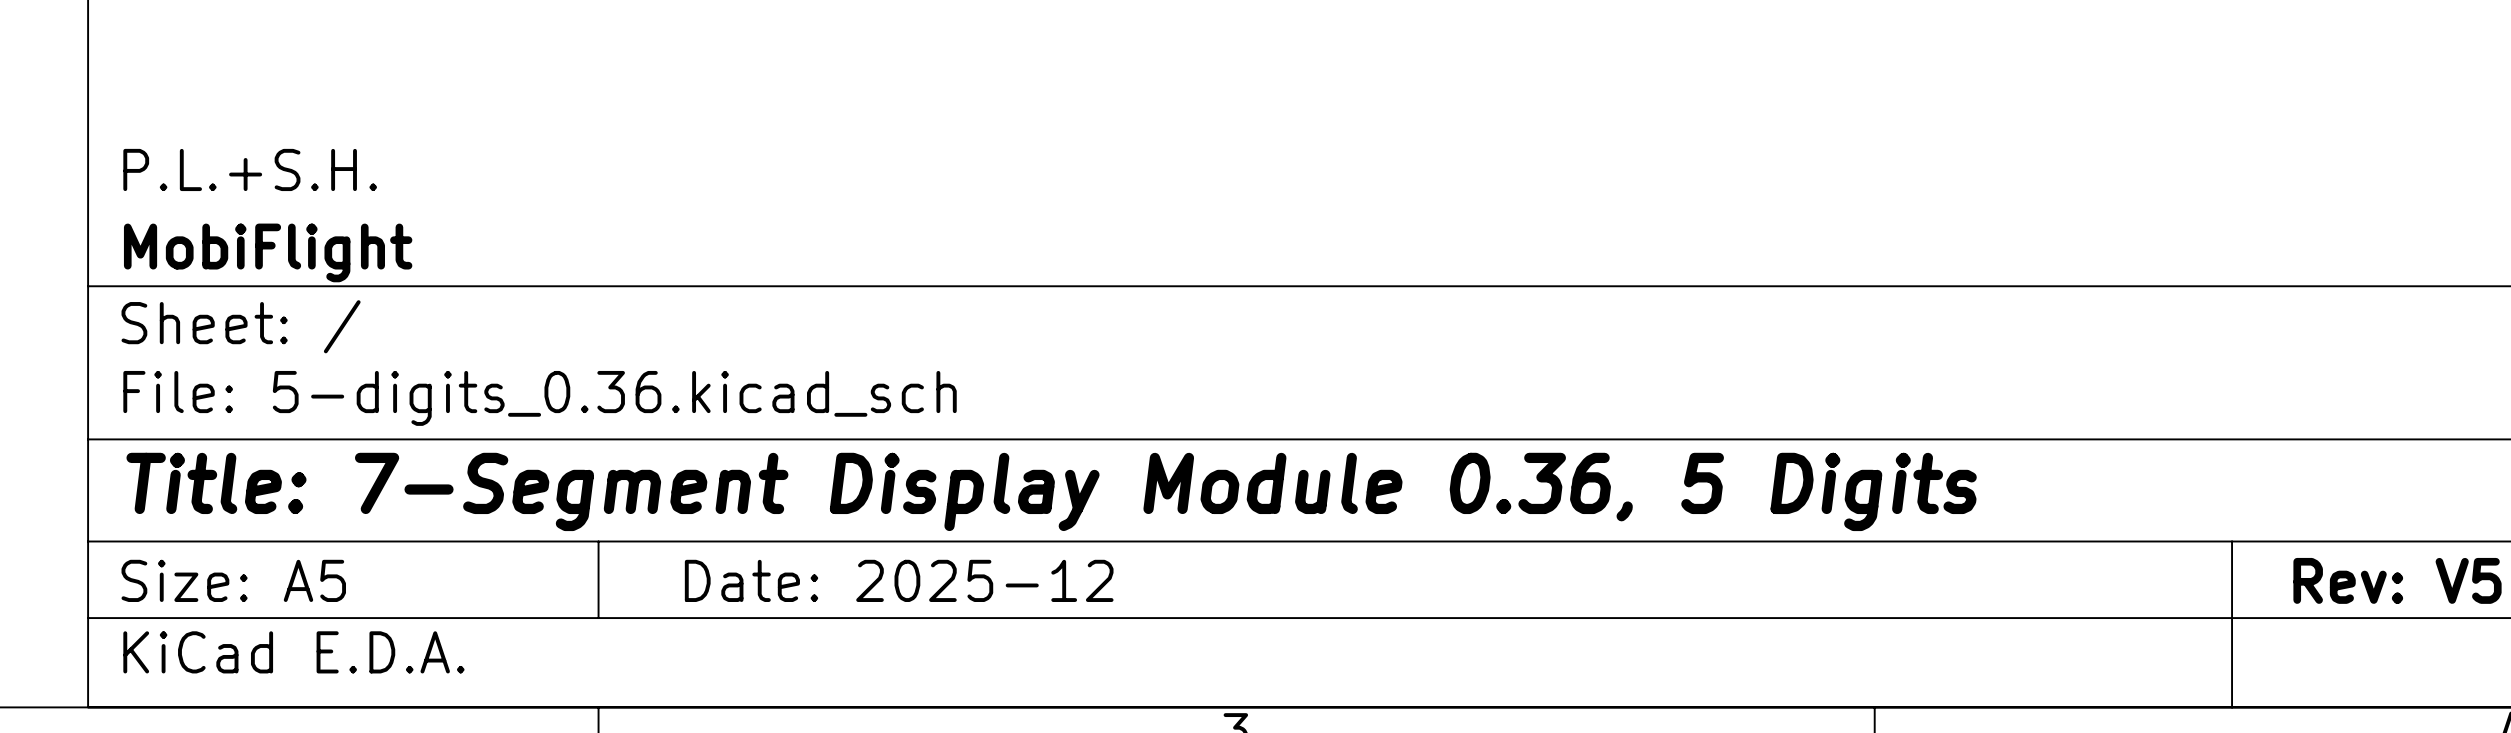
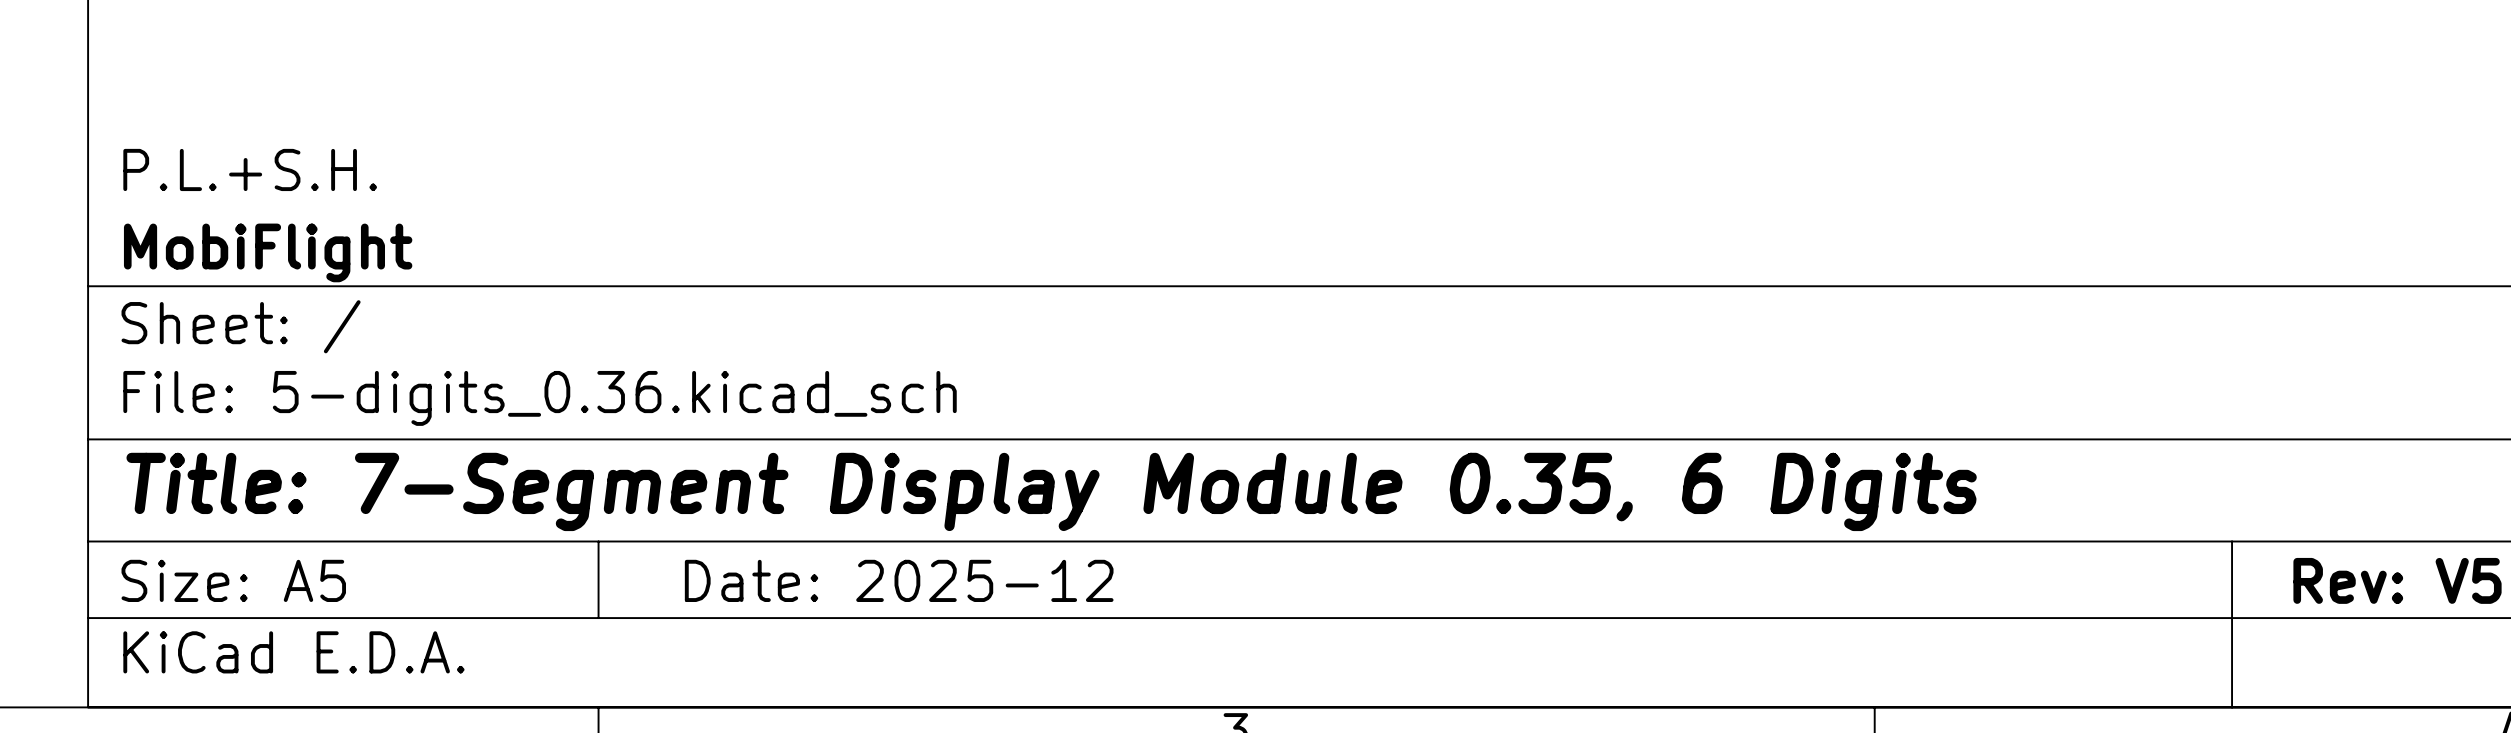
title block: Title: 7-Segment Display Module 0.36, 5 Digits (1051, 491) -> Title: 7-Segment Display Module 0.35, 6 Digits (1051, 491)

